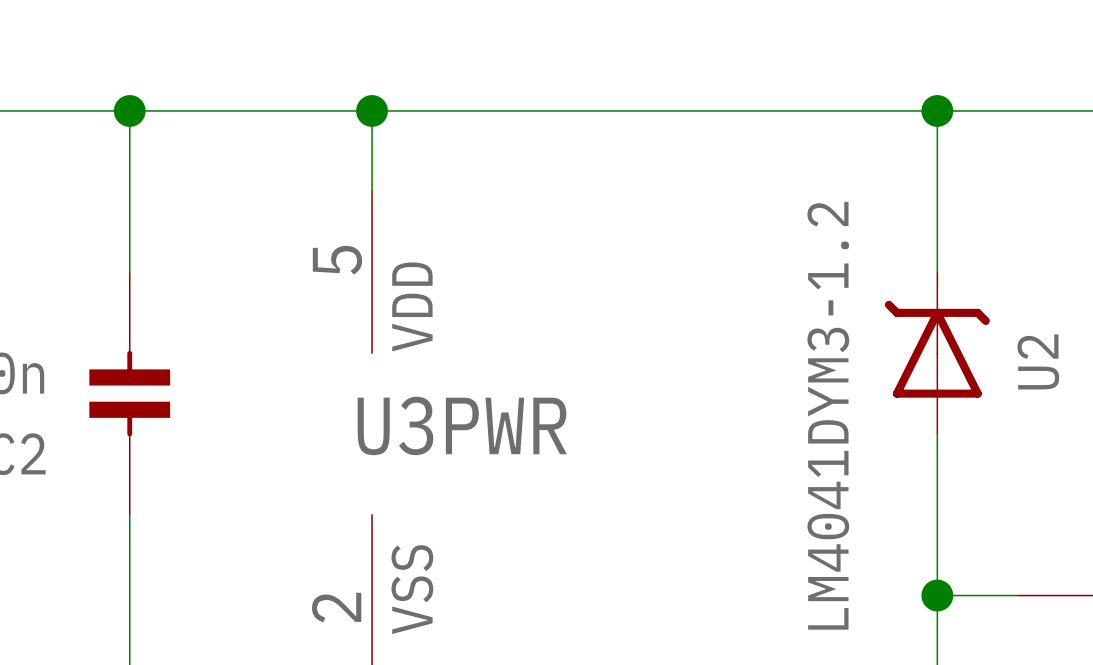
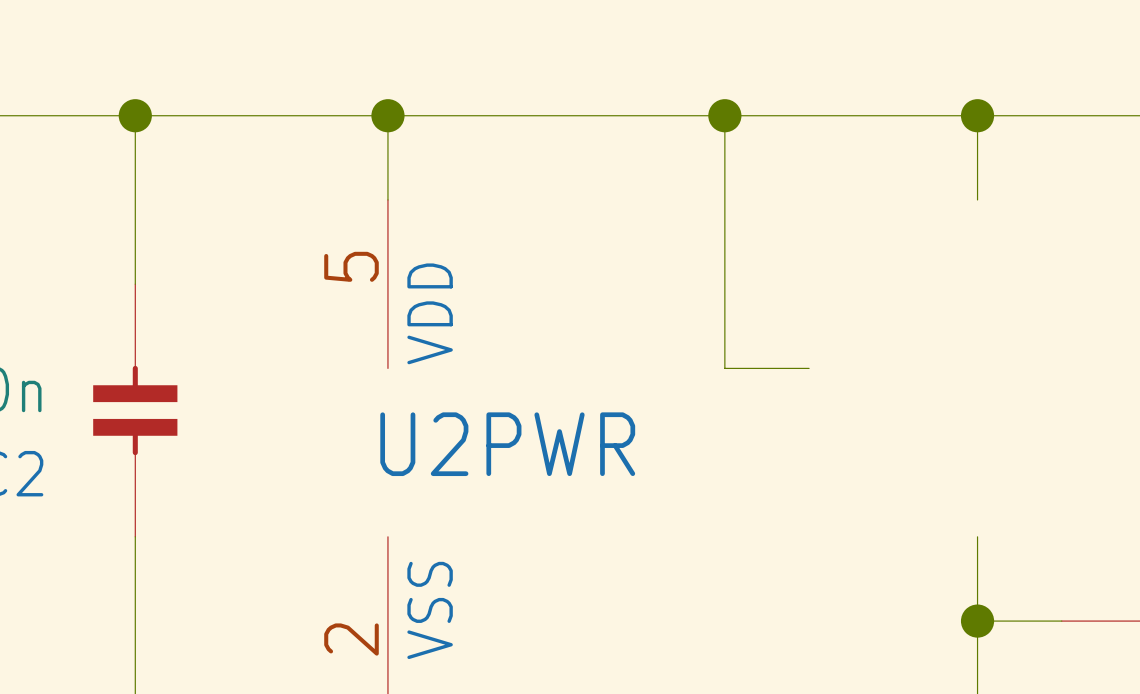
wire: none -> (724, 115) (724, 368) (809, 368)
junction: none -> (724, 115)
wire: (937, 191) (937, 272) -> none
U2: LM4041DYM3-1.2 (937, 353) -> none
U3PWR name: U3PWR (462, 425) -> U2PWR (507, 444)
wire: (937, 434) (937, 514) -> none

